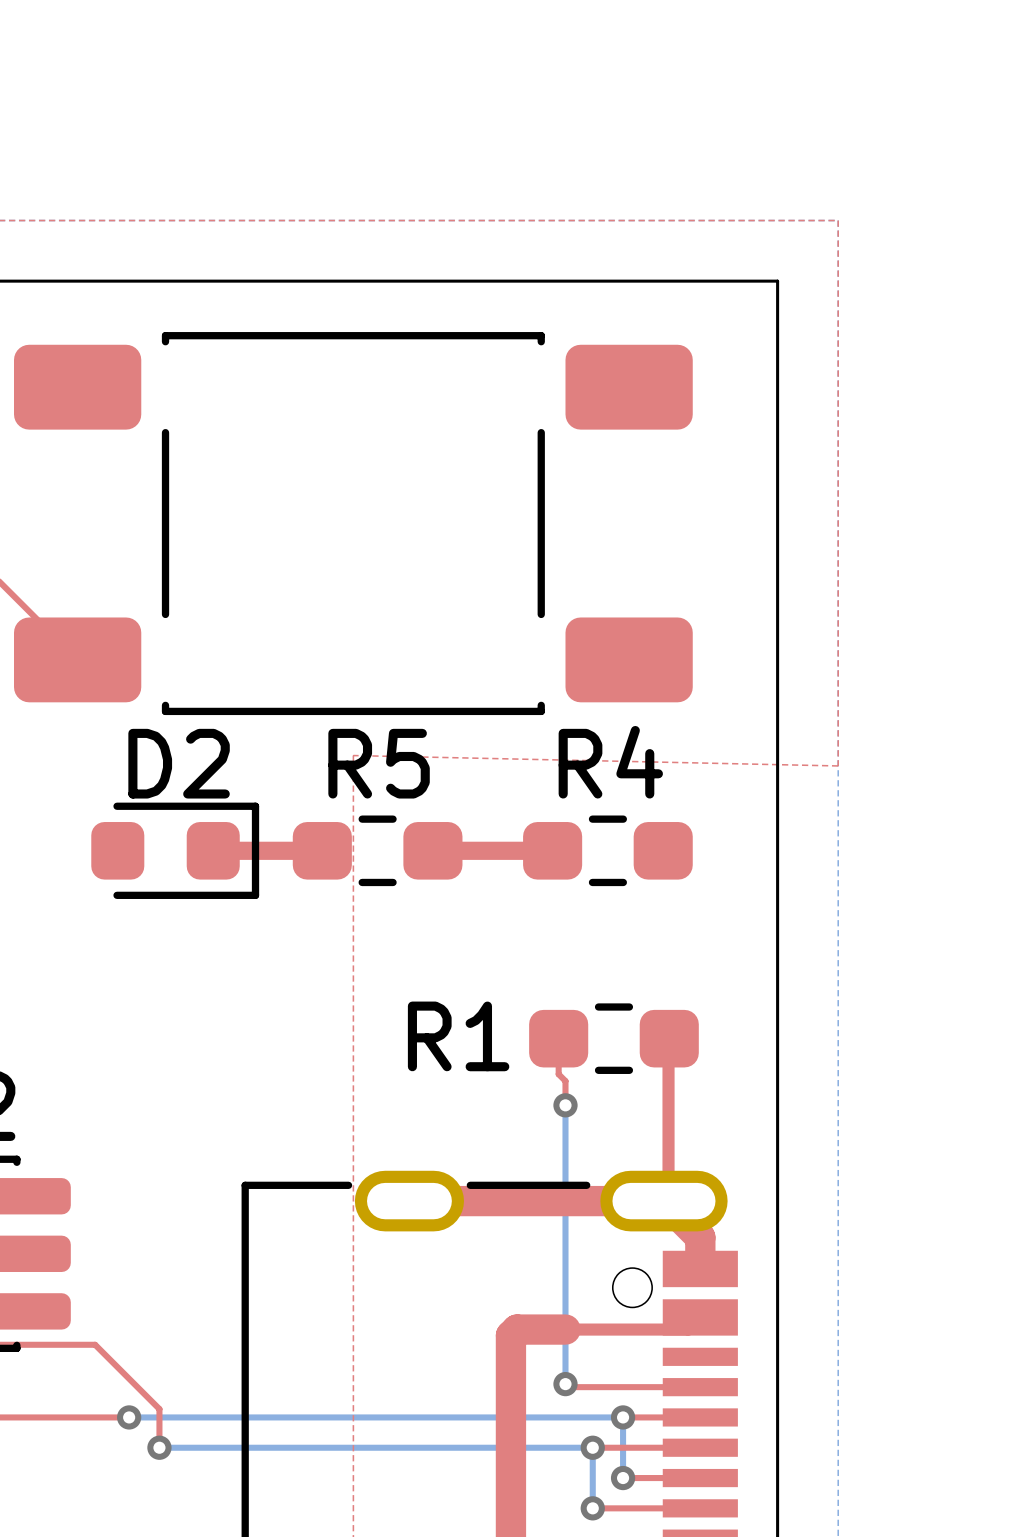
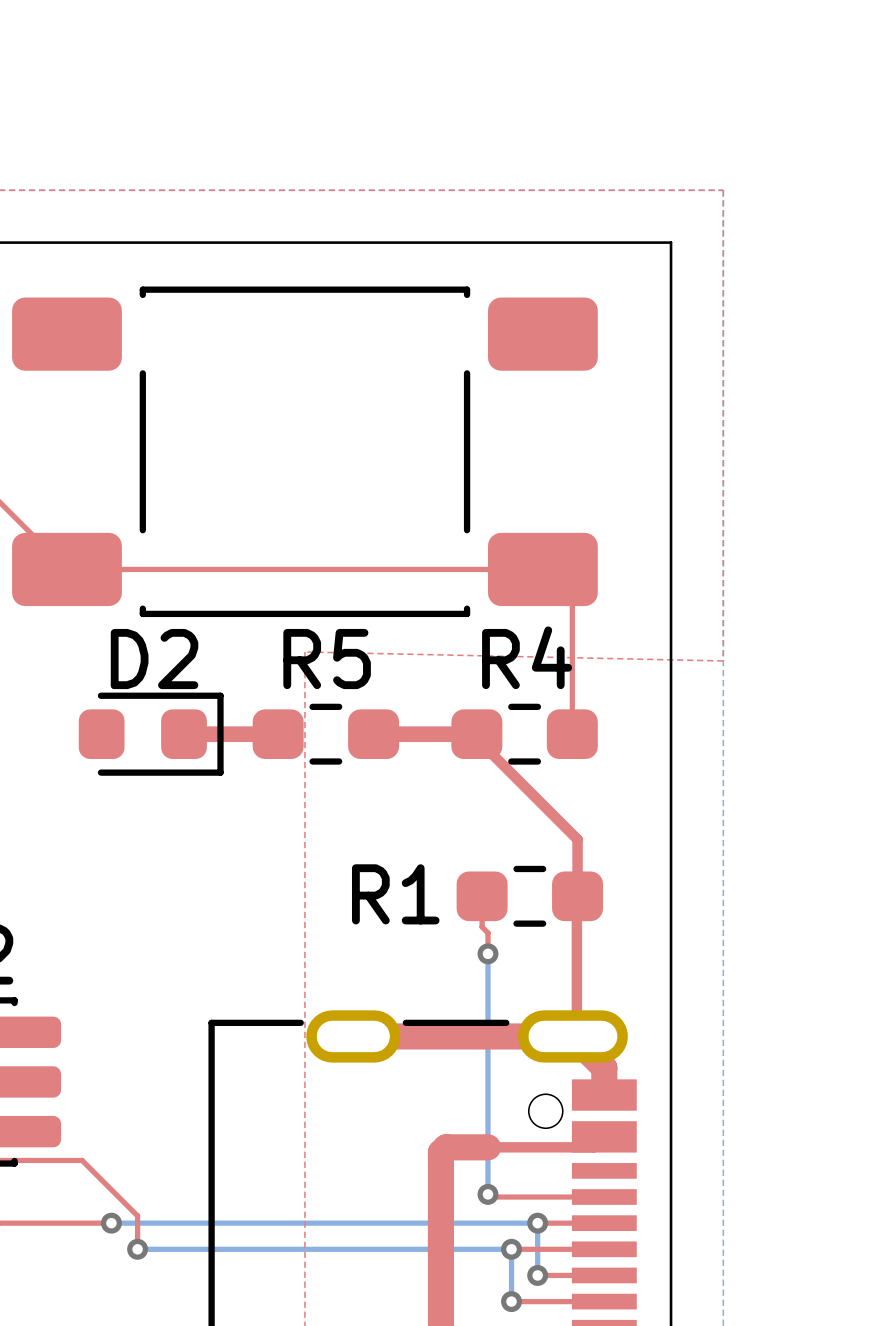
top track: none -> (66, 569) (542, 569) (572, 598) (572, 734)
top track: none -> (476, 734) (476, 738) (577, 839) (577, 896)

